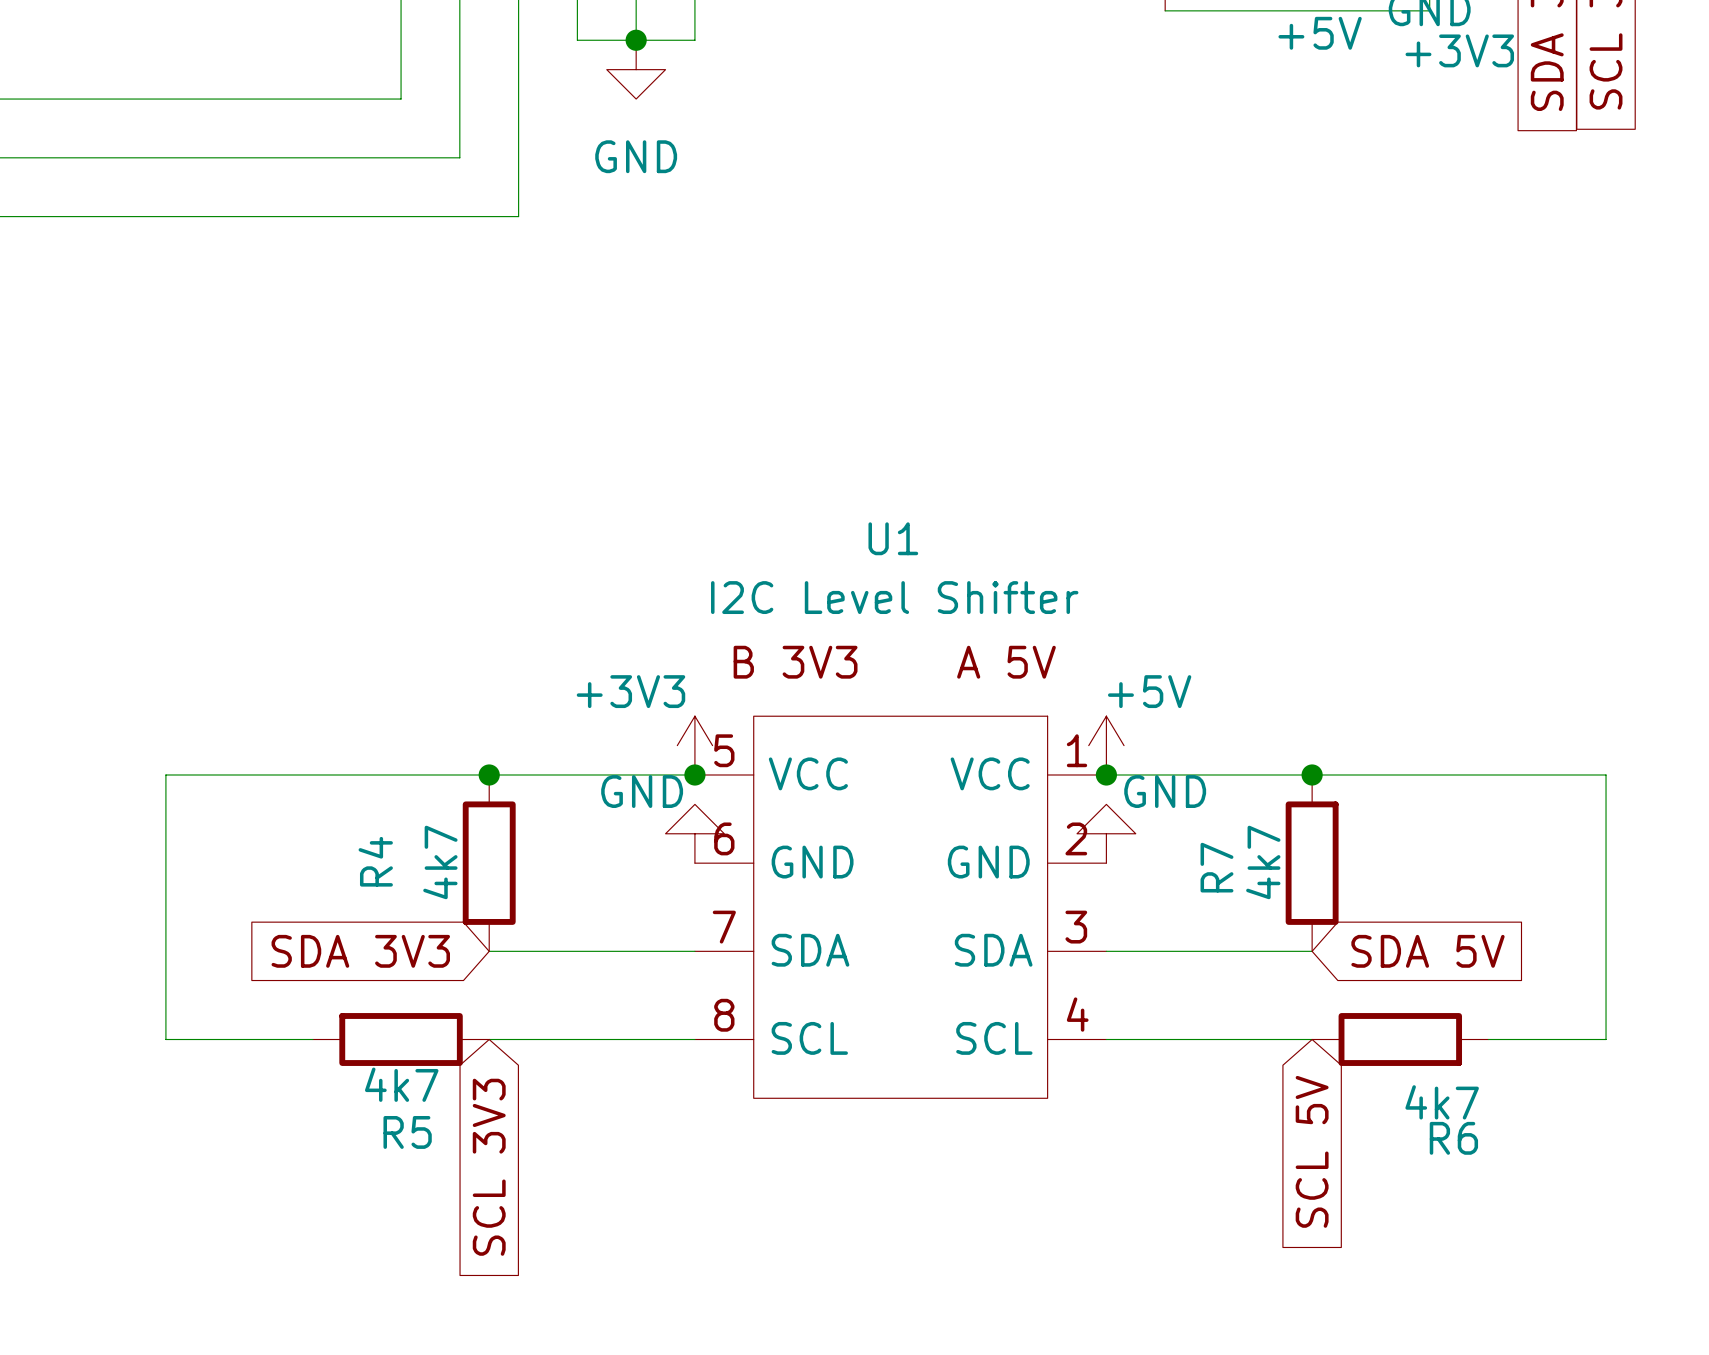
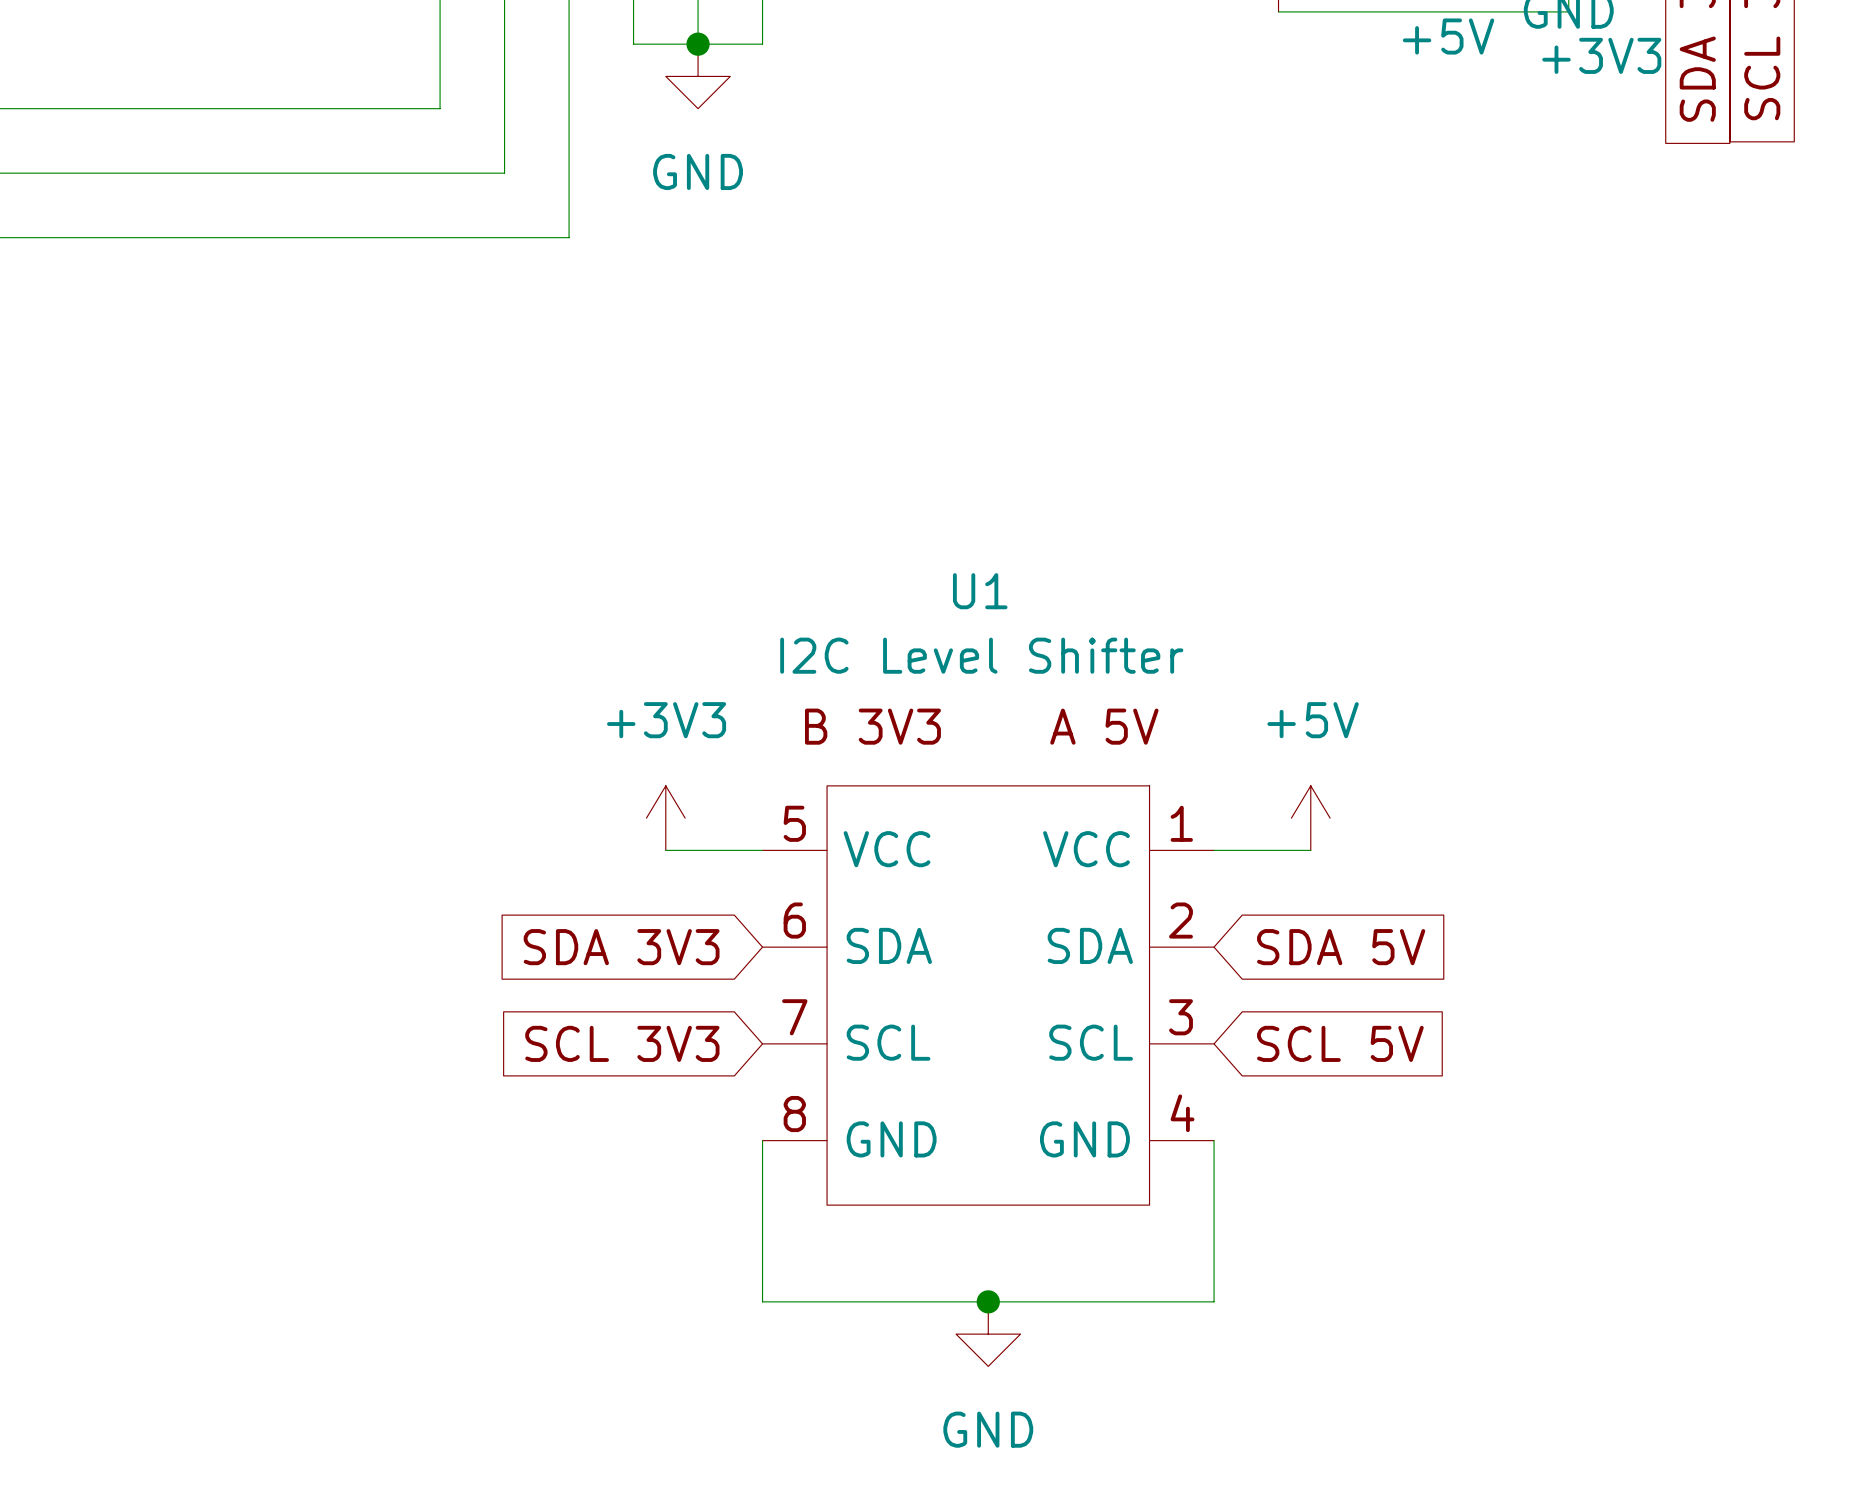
power symbol text position: +3V3 (630, 691) -> +3V3 (666, 720)
power symbol text position: +5V (1149, 691) -> +5V (1313, 720)
power symbol position: +3V3 (694, 745) -> +3V3 (665, 818)
power symbol position: +5V (1106, 745) -> +5V (1310, 818)
junction: (489, 774) -> none
wire: (606, 774) (165, 774) (165, 1039) (312, 1039) -> none
junction: (694, 774) -> none
junction: (1106, 774) -> none
wire: (1194, 774) (1606, 774) (1606, 1039) (1488, 1039) -> none
junction: (1312, 774) -> none
power symbol: GND (694, 833) -> none
power symbol: GND (1106, 833) -> none
U1 pin name: GND (812, 862) -> SDA (889, 945)
U1 pin name: GND (988, 862) -> SDA (1090, 945)
R4: 4k7 (489, 863) -> none
R7: 4k7 (1312, 863) -> none
U1 pin name: SDA (810, 950) -> SCL (888, 1042)
U1 pin name: SDA (993, 950) -> SCL (1091, 1042)
global label position: SDA 3V3 (360, 951) -> SDA 3V3 (621, 947)
wire: (489, 951) (694, 951) -> none
wire: (1106, 951) (1312, 951) -> none
global label position: SDA 5V (1427, 951) -> SDA 5V (1341, 947)
U1 pin name: SCL (809, 1038) -> GND (891, 1139)
U1 pin name: SCL (994, 1038) -> GND (1084, 1139)
R5: 4k7 (401, 1039) -> none
wire: (489, 1039) (694, 1039) -> none
wire: (1106, 1039) (1312, 1039) -> (1214, 1140) (1214, 1301) (762, 1301) (762, 1140)
R6: 4k7 (1400, 1039) -> none
global label rotation: 0° (1312, 1151) -> 90° counterclockwise (1340, 1043)
global label rotation: 0° (489, 1167) -> 90° clockwise (622, 1043)
junction: none -> (988, 1301)
power symbol: none -> GND (988, 1334)

